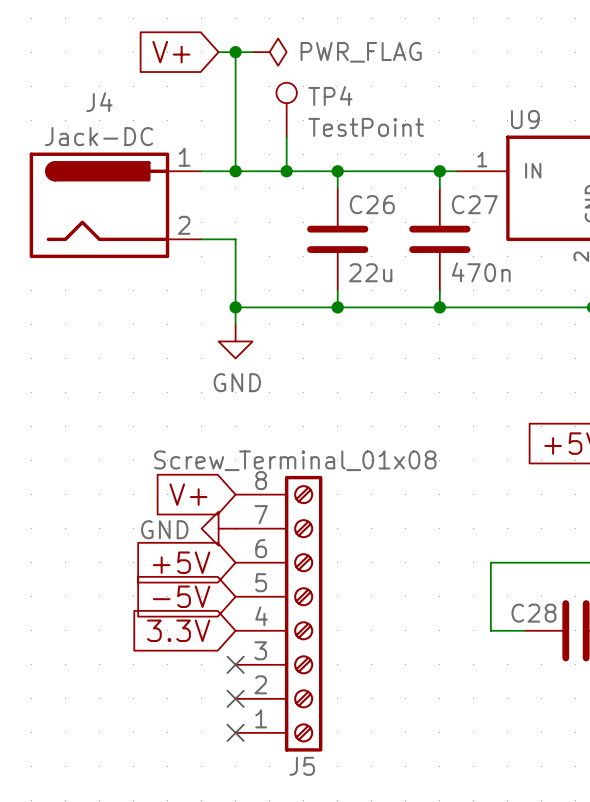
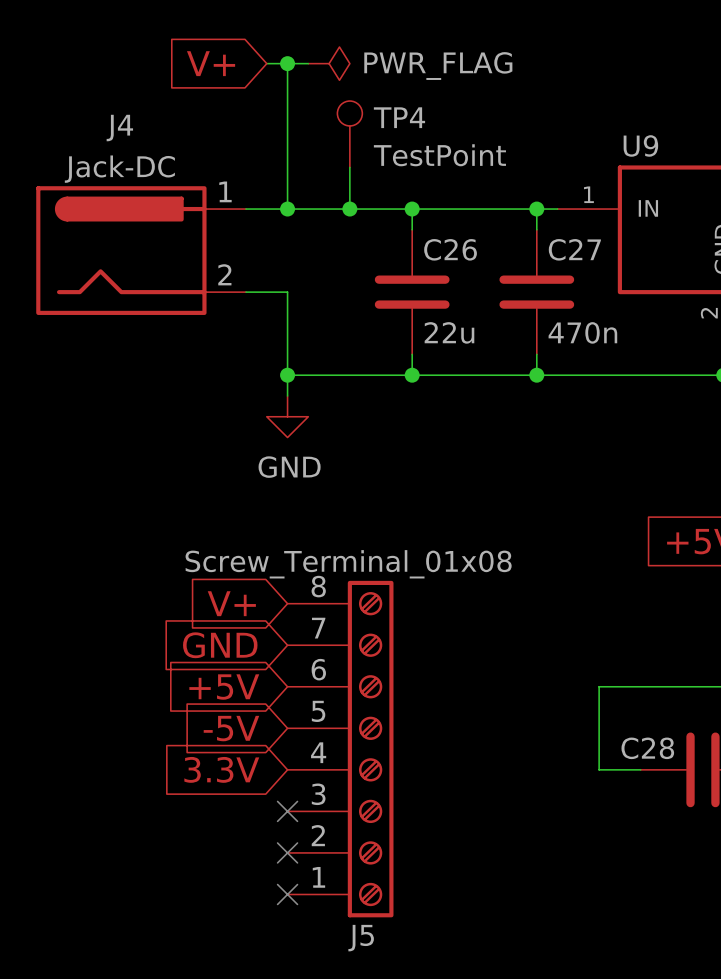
global label: none -> GND (220, 645)
power symbol: GND (218, 528) -> none

